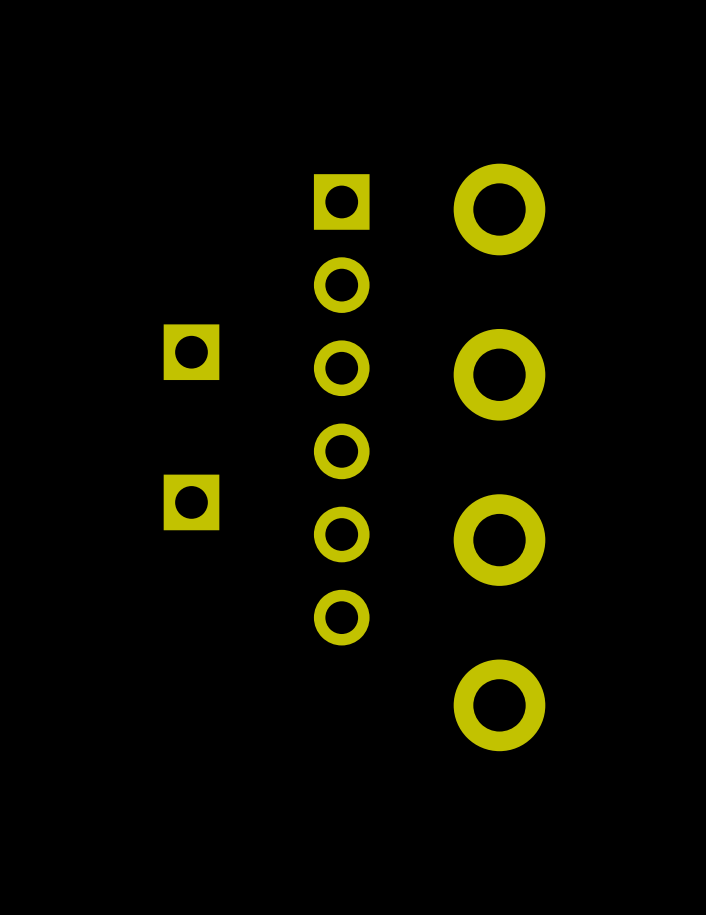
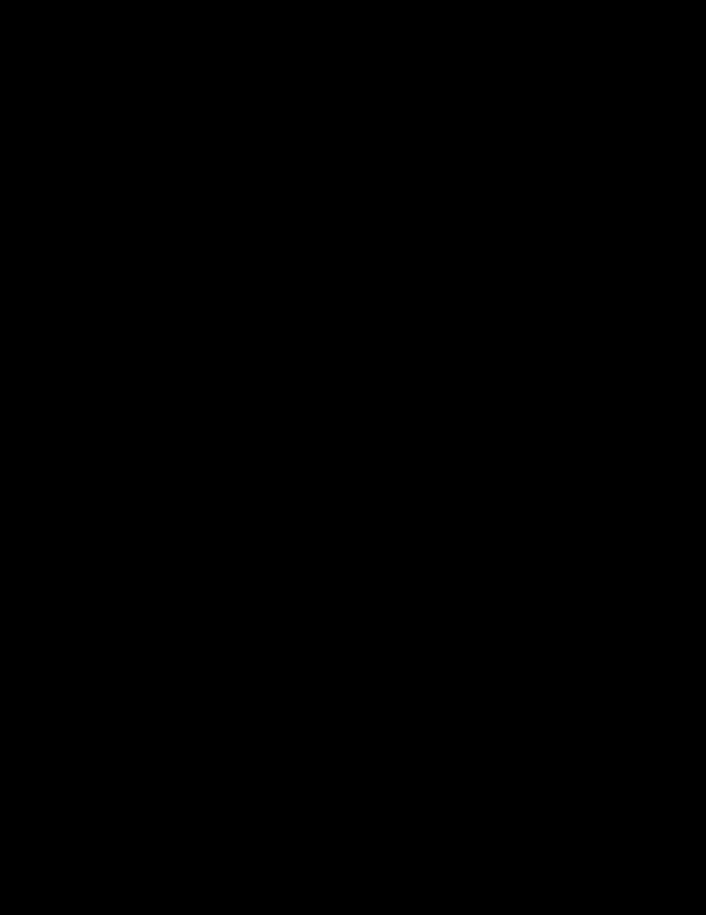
part: (499, 209) -> none
part: (191, 352) -> none
part: (499, 374) -> none
part: (341, 409) -> none
part: (191, 502) -> none
part: (499, 540) -> none
part: (499, 705) -> none

